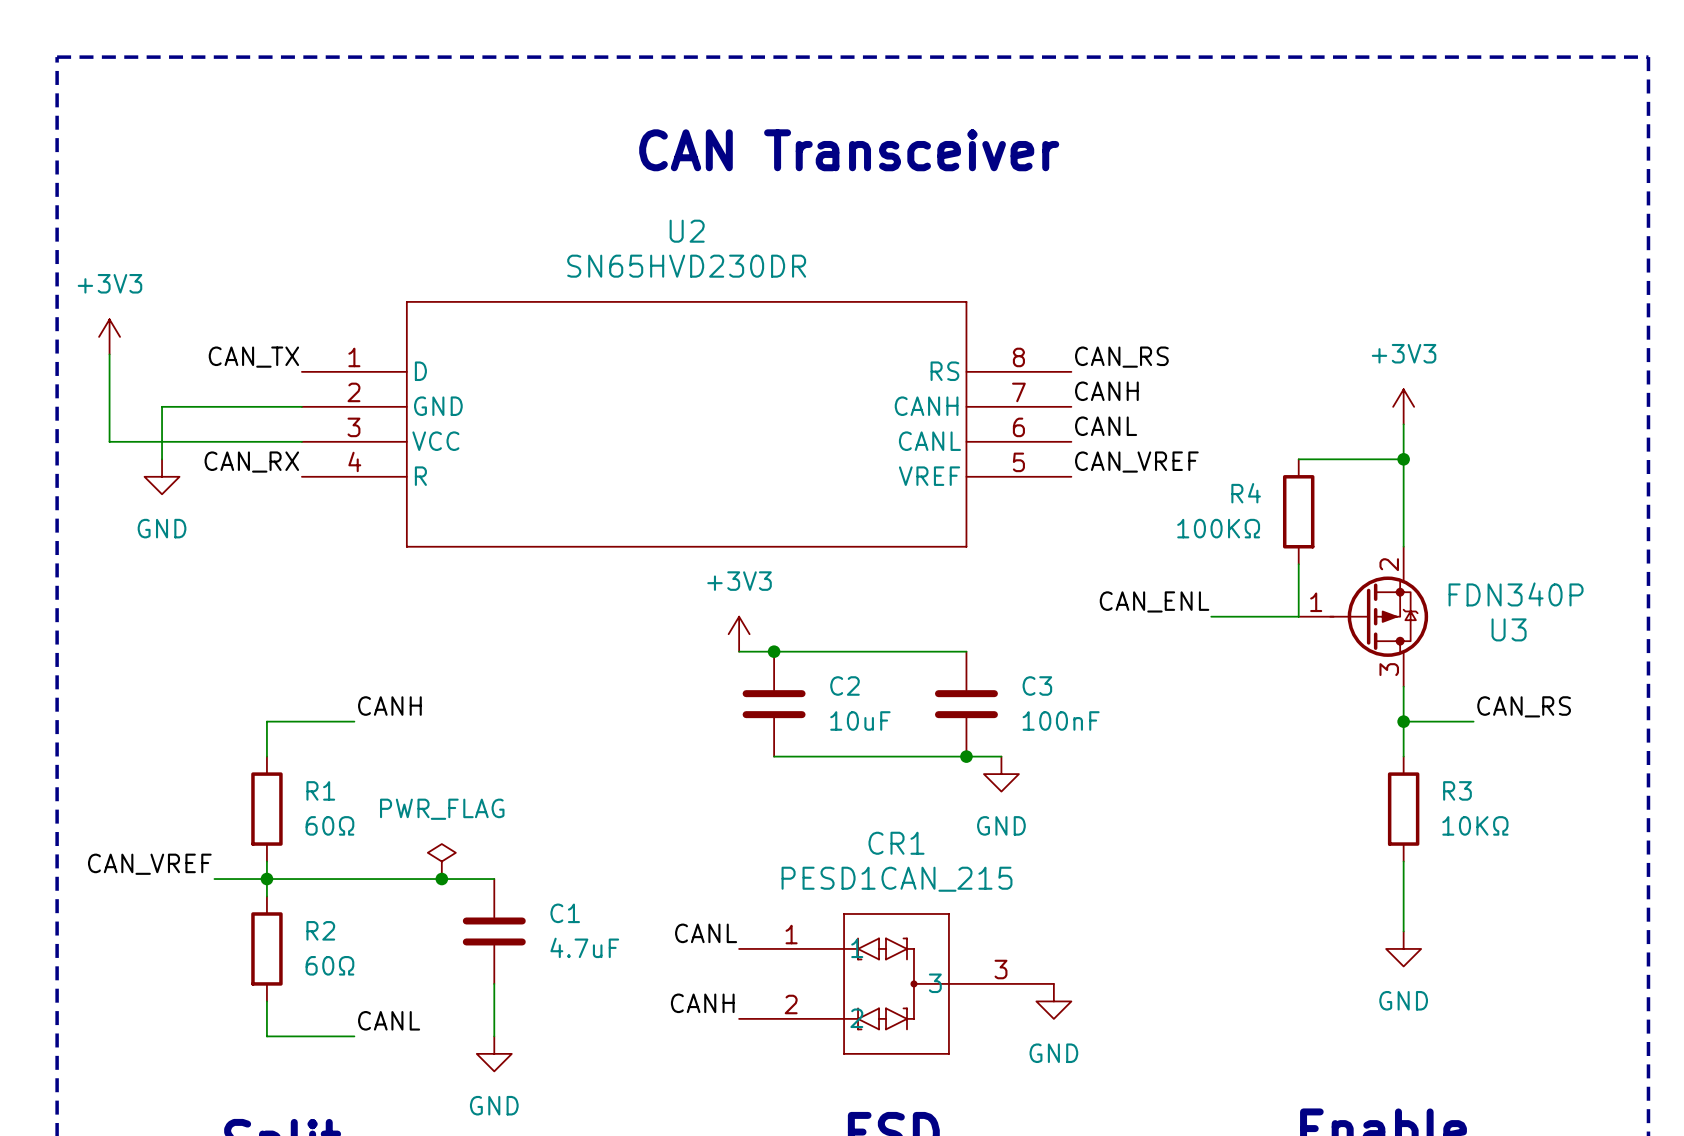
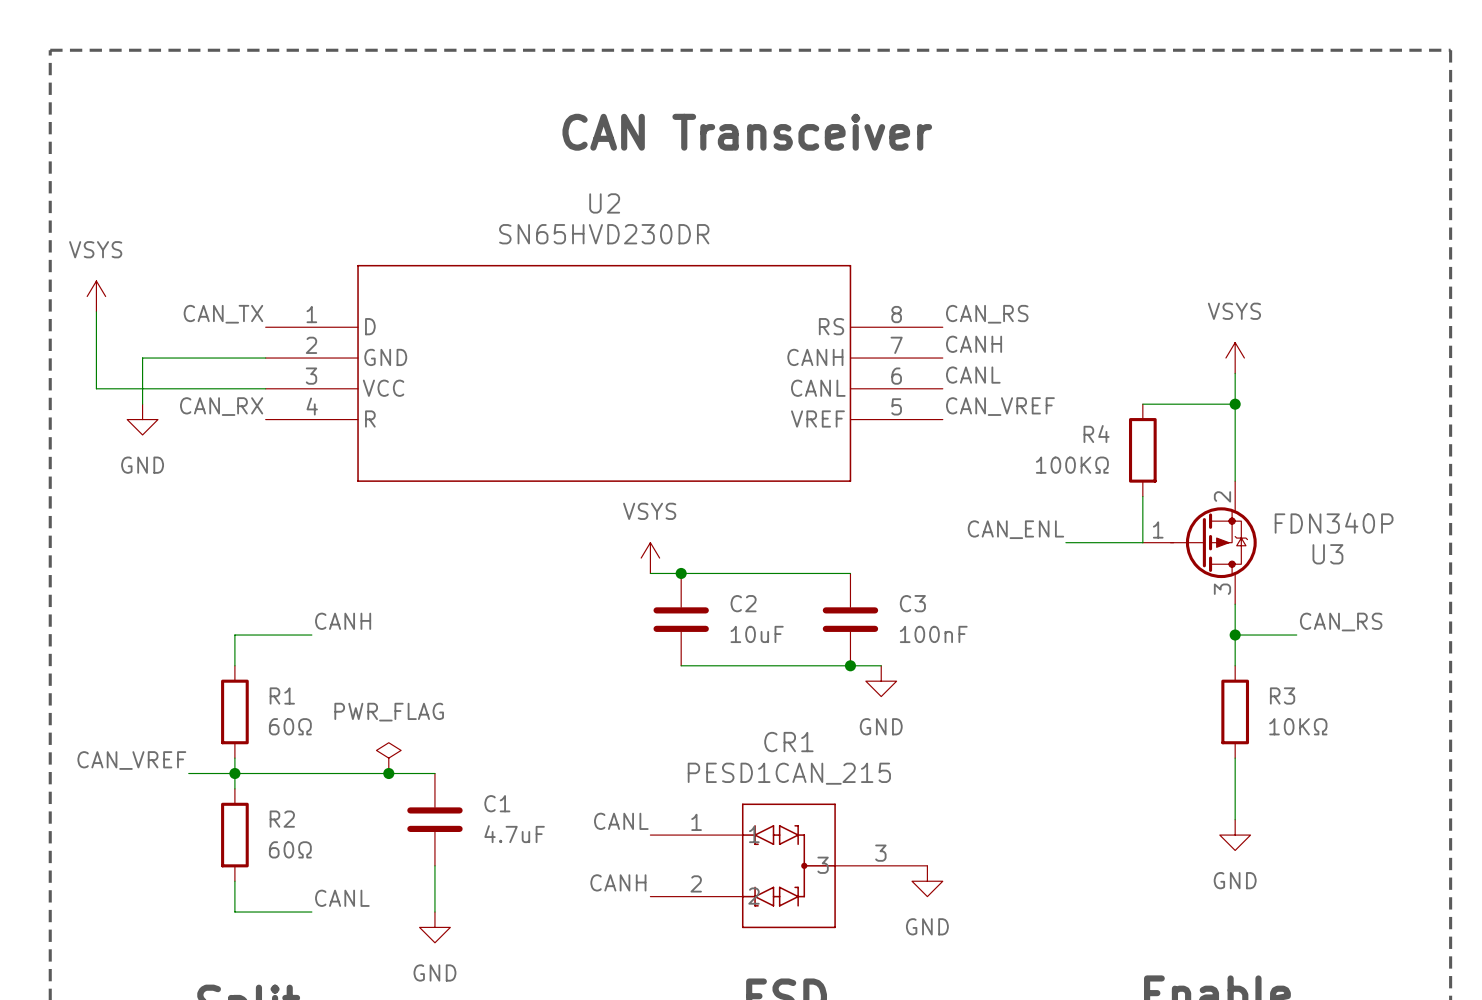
power symbol: +3V3 (109, 336) -> VSYS (96, 296)
power symbol: +3V3 (1403, 406) -> VSYS (1235, 358)
power symbol: +3V3 (739, 634) -> VSYS (650, 558)

